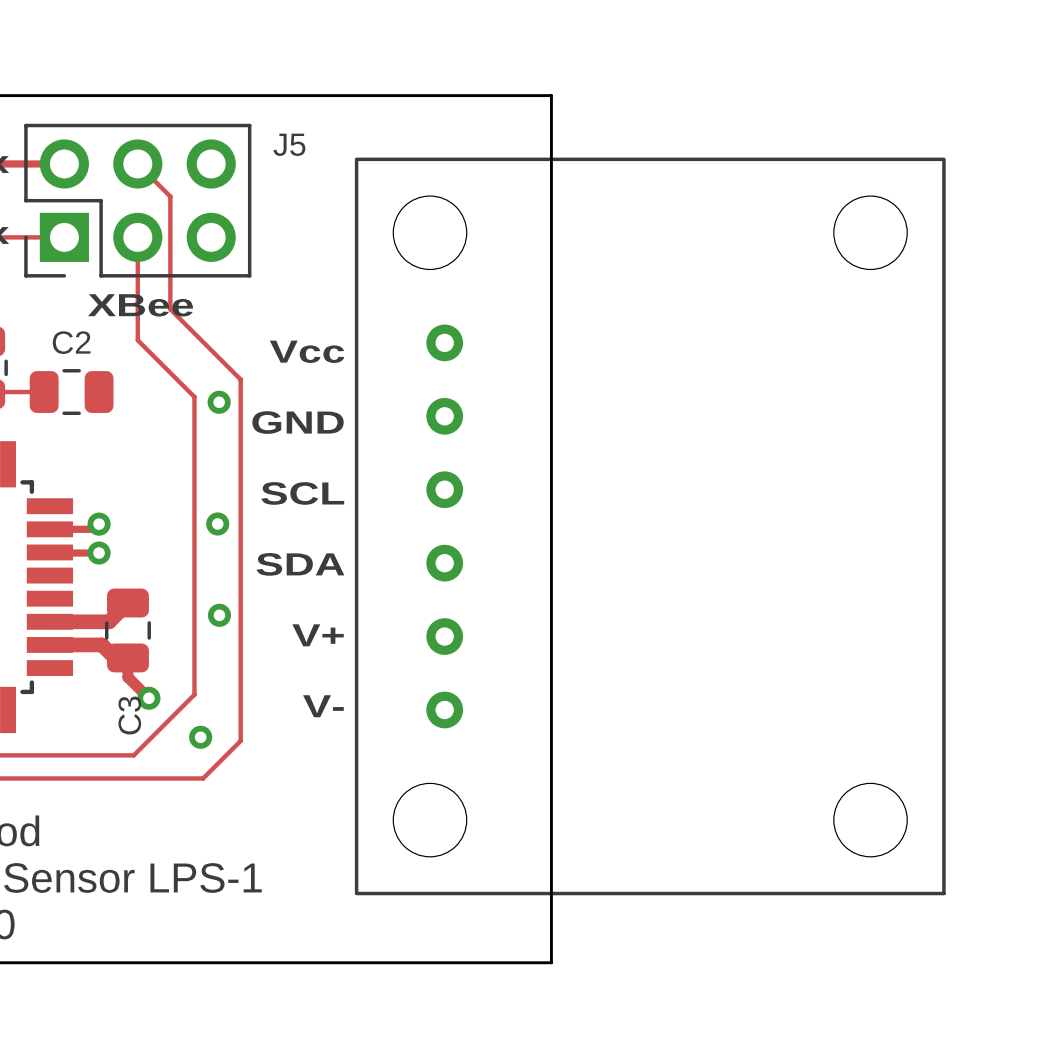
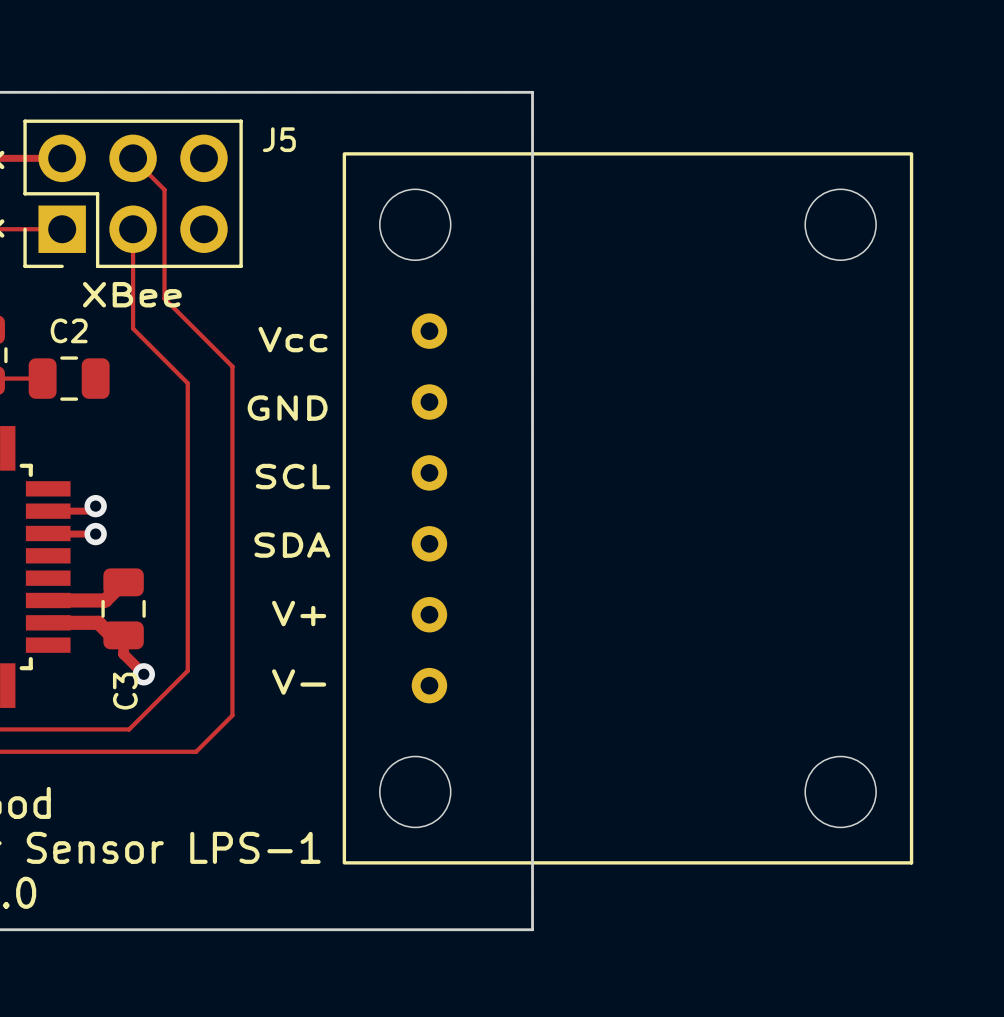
via: (219, 402) -> none
via: (217, 523) -> none
via: (219, 615) -> none
via: (200, 737) -> none

